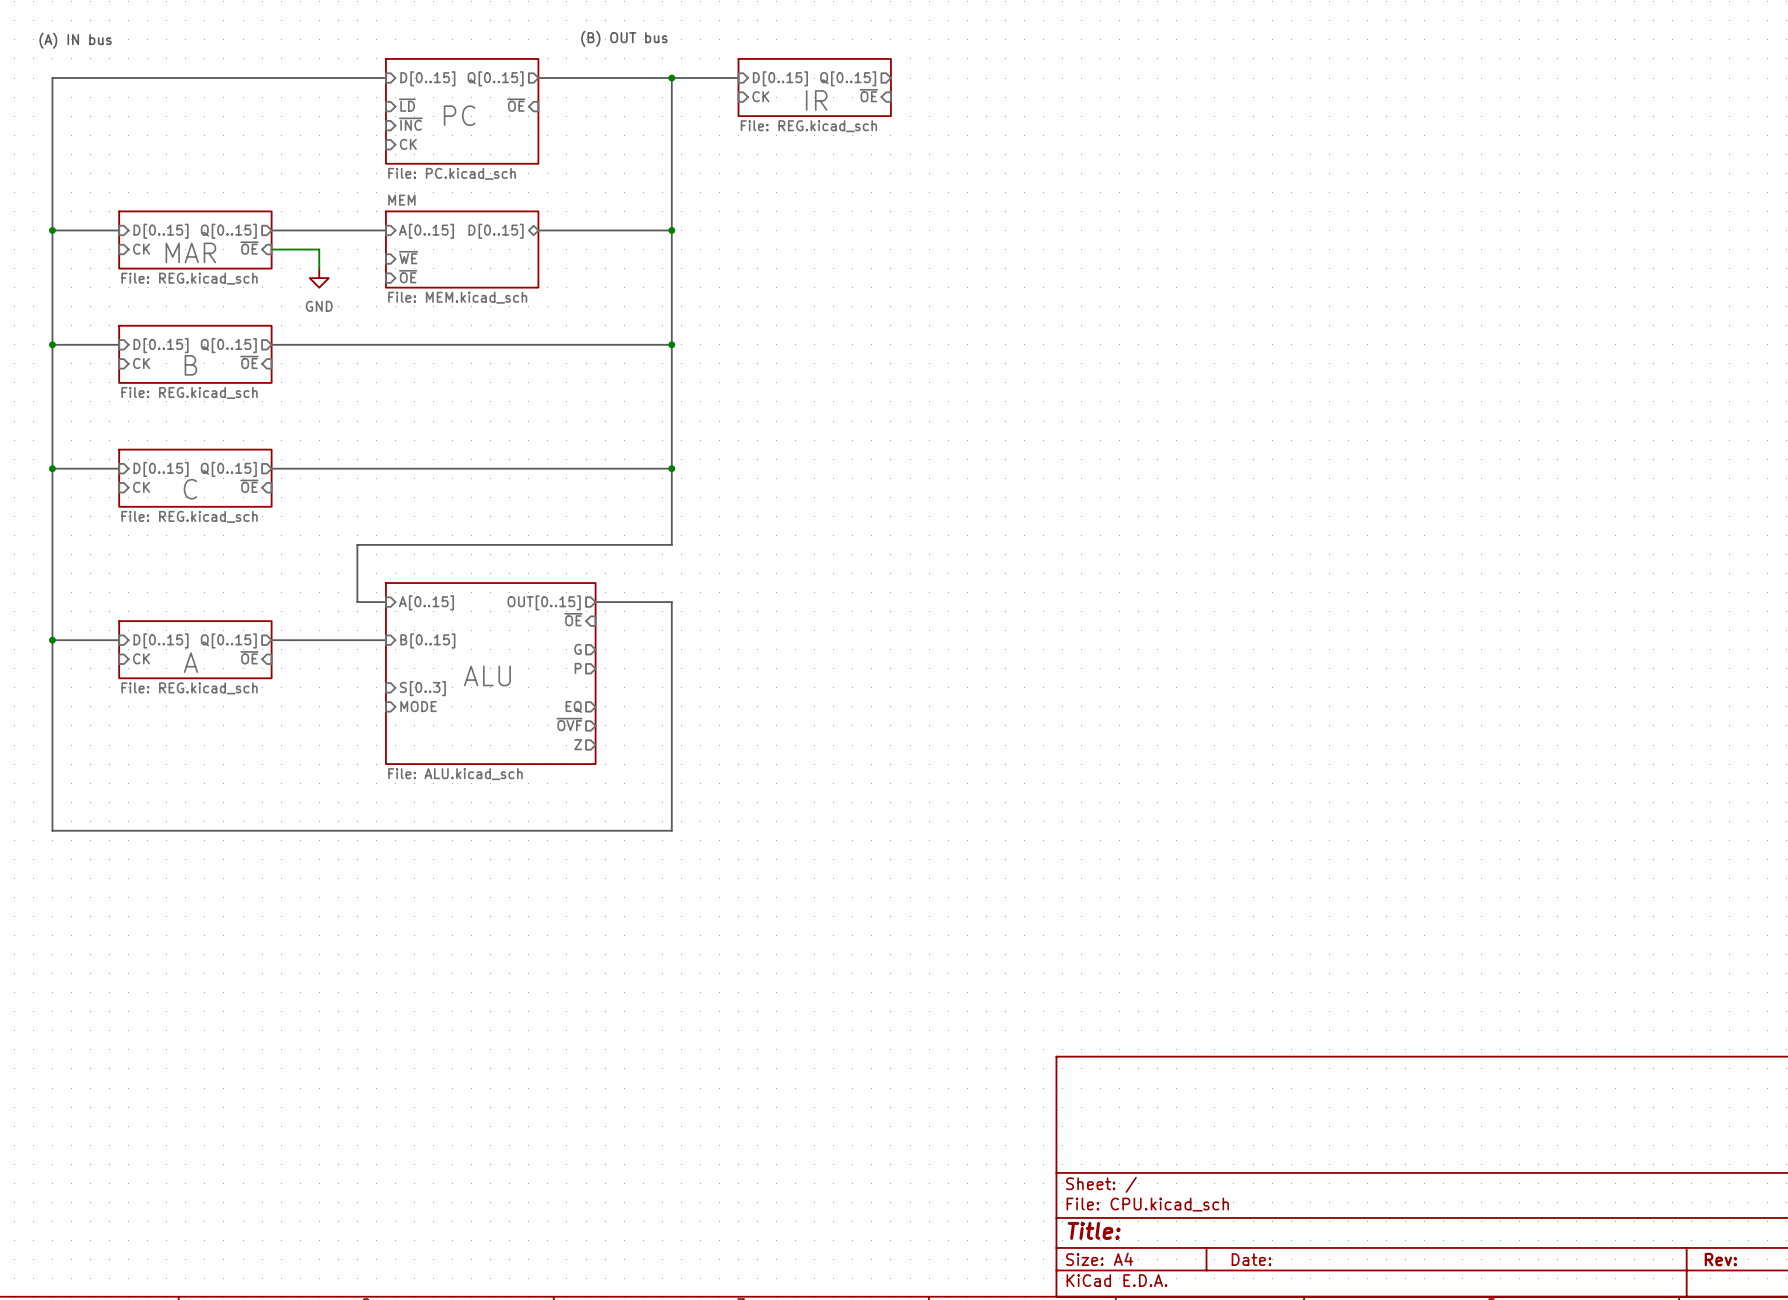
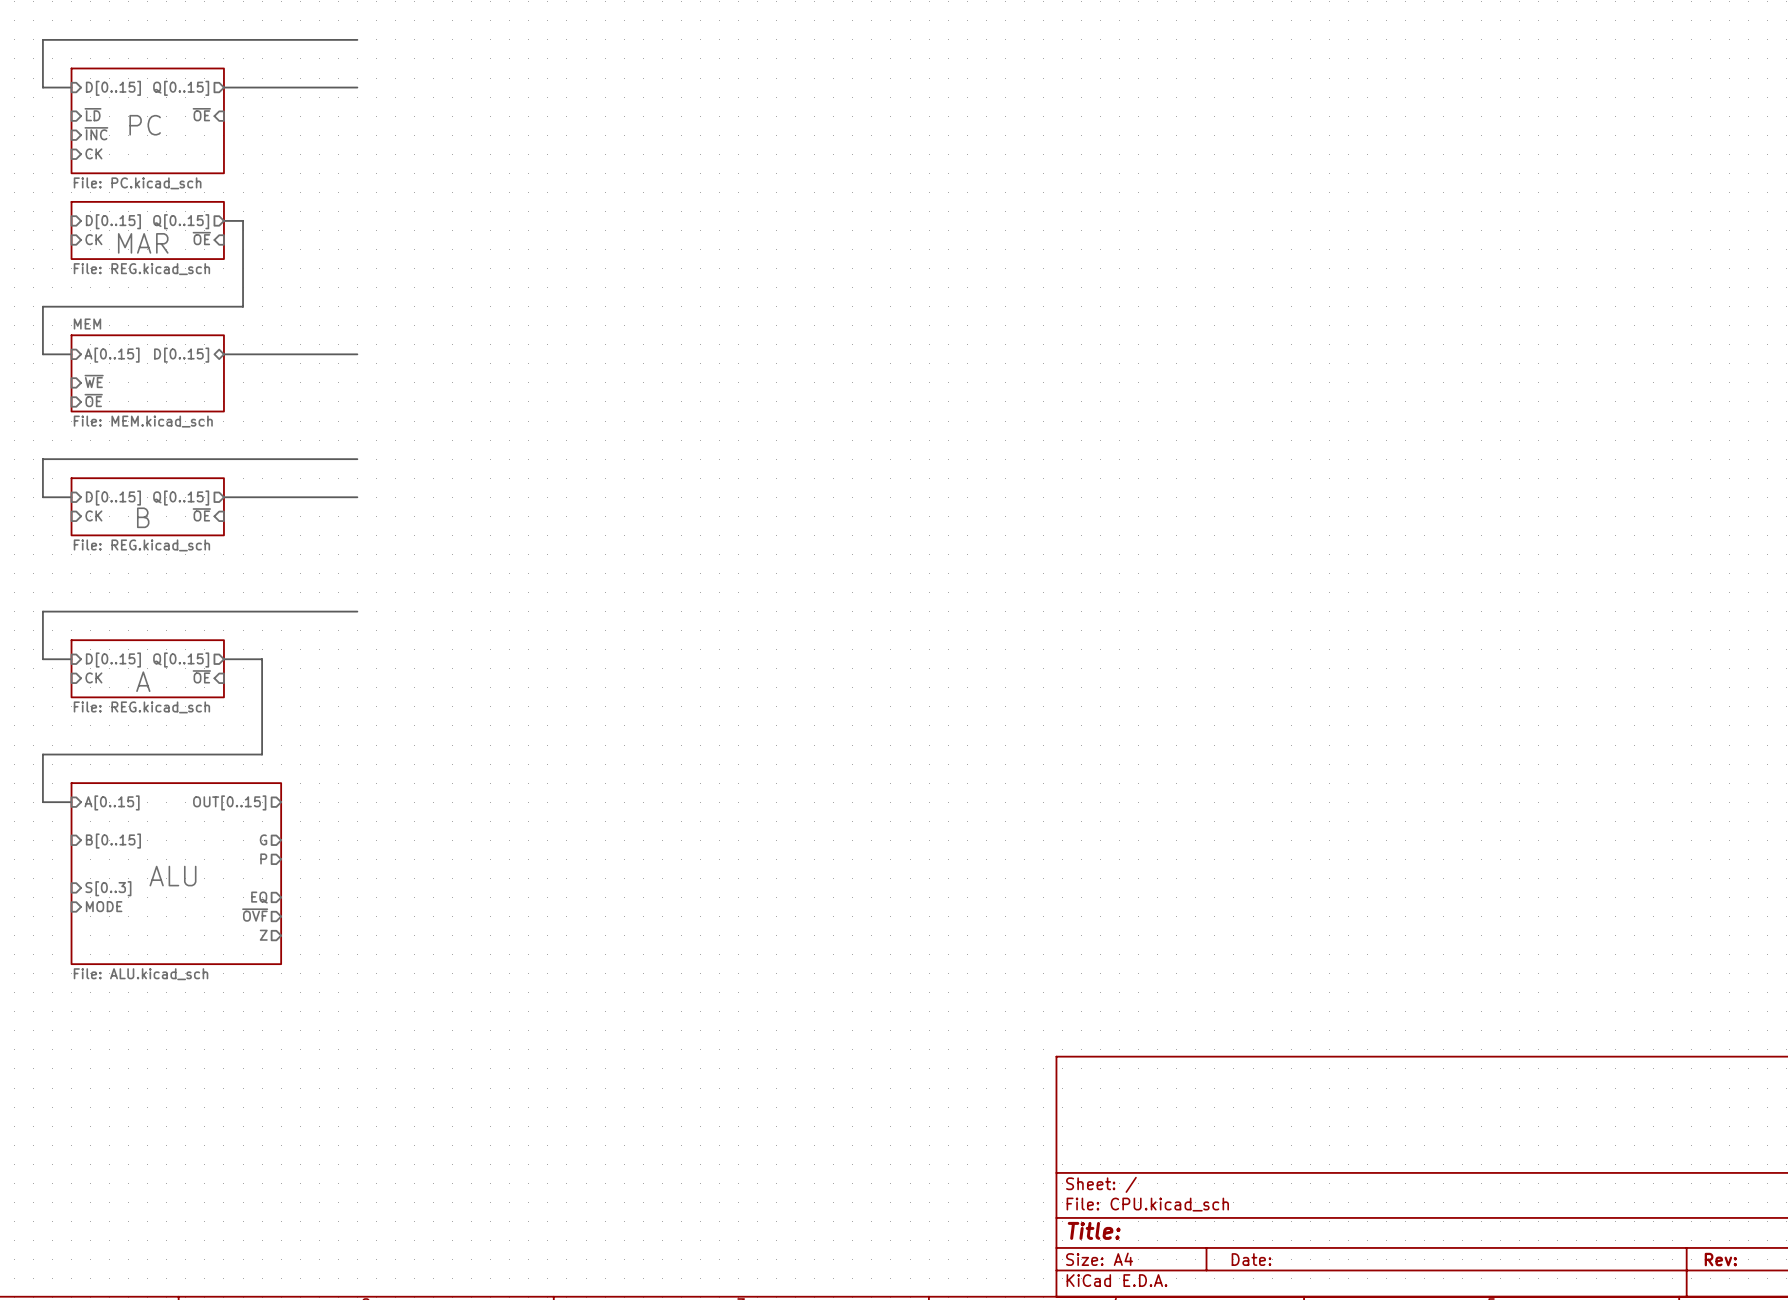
text: (B) OUT bus (624, 38) -> none
bus: none -> (357, 39) (42, 39) (42, 87) (71, 87)
text: (A) IN bus (75, 40) -> none
bus: (385, 78) (52, 78) (52, 830) (671, 830) (671, 602) (595, 602) -> none
sheet pin: D[0..15] (427, 78) -> none
sheet pin: Q[0..15] (495, 78) -> none
bus: (538, 78) (738, 78) -> none
bus: (671, 78) (671, 544) (357, 544) (357, 602) (385, 602) -> none
junction: (671, 78) -> none
sheet pin: D[0..15] (780, 78) -> none
sheet pin: Q[0..15] (848, 78) -> none
bus: none -> (223, 87) (357, 87)
sheet IR: File: REG.kicad_sch (814, 87) -> none
sheet pin: none -> D[0..15] (113, 88)
sheet pin: none -> Q[0..15] (181, 88)
sheet pin: ~{OE} (868, 95) -> none
sheet pin: CK (760, 96) -> none
sheet pin: ~{LD} (407, 105) -> none
sheet pin: ~{OE} (516, 105) -> none
sheet PC: File: PC.kicad_sch (462, 111) -> none
sheet pin: none -> ~{LD} (92, 114)
sheet pin: none -> ~{OE} (201, 114)
sheet PC: none -> File: PC.kicad_sch (147, 120)
sheet pin: ~{INC} (410, 124) -> none
sheet pin: none -> ~{INC} (96, 133)
sheet pin: CK (408, 144) -> none
sheet pin: none -> CK (93, 153)
bus: none -> (223, 220) (243, 220) (243, 306) (42, 306) (42, 354) (71, 354)
bus: (52, 230) (119, 230) -> none
junction: (52, 230) -> none
bus: (271, 230) (385, 230) -> none
bus: (538, 230) (671, 230) -> none
junction: (671, 230) -> none
sheet pin position: D[0..15] (161, 231) -> D[0..15] (113, 221)
sheet pin position: Q[0..15] (228, 231) -> Q[0..15] (181, 221)
sheet pin: A[0..15] (426, 231) -> none
sheet pin: D[0..15] (496, 231) -> none
sheet MAR position: (195, 240) -> (147, 230)
sheet pin position: ~{OE} (249, 248) -> ~{OE} (201, 238)
sheet pin position: CK (141, 249) -> CK (93, 239)
wire: (271, 249) (319, 249) (319, 268) -> none
sheet MEM: File: MEM.kicad_sch (462, 249) -> none
sheet pin: ~{WE} (408, 257) -> none
sheet pin: ~{OE} (408, 276) -> none
power symbol: GND (319, 278) -> none
bus: (52, 344) (119, 344) -> none
junction: (52, 344) -> none
bus: (271, 344) (671, 344) -> none
junction: (671, 344) -> none
sheet pin: D[0..15] (161, 345) -> none
sheet pin: Q[0..15] (228, 345) -> none
sheet B position: (195, 354) -> (147, 506)
bus: none -> (223, 354) (357, 354)
sheet pin: none -> A[0..15] (112, 355)
sheet pin: none -> D[0..15] (181, 355)
sheet pin: ~{OE} (249, 362) -> none
sheet pin: CK (141, 363) -> none
sheet MEM: none -> File: MEM.kicad_sch (147, 373)
sheet pin: none -> ~{WE} (94, 381)
sheet pin: none -> ~{OE} (93, 400)
bus: none -> (357, 459) (42, 459) (42, 497) (71, 497)
bus: (52, 468) (119, 468) -> none
junction: (52, 468) -> none
bus: (271, 468) (671, 468) -> none
junction: (671, 468) -> none
sheet pin position: D[0..15] (161, 469) -> D[0..15] (113, 498)
sheet pin position: Q[0..15] (228, 469) -> Q[0..15] (181, 498)
sheet C: File: REG.kicad_sch (195, 478) -> none
sheet pin position: ~{OE} (249, 486) -> ~{OE} (201, 514)
sheet pin position: CK (141, 487) -> CK (93, 515)
bus: none -> (223, 497) (357, 497)
sheet pin: A[0..15] (426, 602) -> none
sheet pin: OUT[0..15] (544, 602) -> none
bus: none -> (357, 611) (42, 611) (42, 659) (71, 659)
sheet pin: ~{OE} (573, 619) -> none
bus: (52, 640) (119, 640) -> none
junction: (52, 640) -> none
sheet pin position: D[0..15] (161, 640) -> D[0..15] (113, 660)
sheet pin position: Q[0..15] (228, 640) -> Q[0..15] (181, 660)
bus: (271, 640) (385, 640) -> none
sheet pin: B[0..15] (427, 640) -> none
sheet A position: (195, 649) -> (147, 668)
sheet pin: G (577, 649) -> none
sheet pin position: ~{OE} (249, 657) -> ~{OE} (201, 676)
sheet pin position: CK (141, 658) -> CK (93, 677)
bus: none -> (223, 659) (262, 659) (262, 754) (42, 754) (42, 802) (71, 802)
sheet pin: P (578, 668) -> none
sheet ALU: File: ALU.kicad_sch (490, 673) -> none
sheet pin: S[0..3] (422, 688) -> none
sheet pin: MODE (418, 706) -> none
sheet pin: EQ (573, 706) -> none
sheet pin: ~{OVF} (569, 724) -> none
sheet pin: Z (578, 744) -> none
sheet pin: none -> A[0..15] (112, 802)
sheet pin: none -> OUT[0..15] (229, 802)
sheet pin: none -> G (263, 839)
sheet pin: none -> B[0..15] (113, 841)
sheet pin: none -> P (263, 858)
sheet ALU: none -> File: ALU.kicad_sch (176, 873)
sheet pin: none -> S[0..3] (108, 888)
sheet pin: none -> EQ (259, 897)
sheet pin: none -> MODE (104, 906)
sheet pin: none -> ~{OVF} (255, 915)
sheet pin: none -> Z (263, 935)

